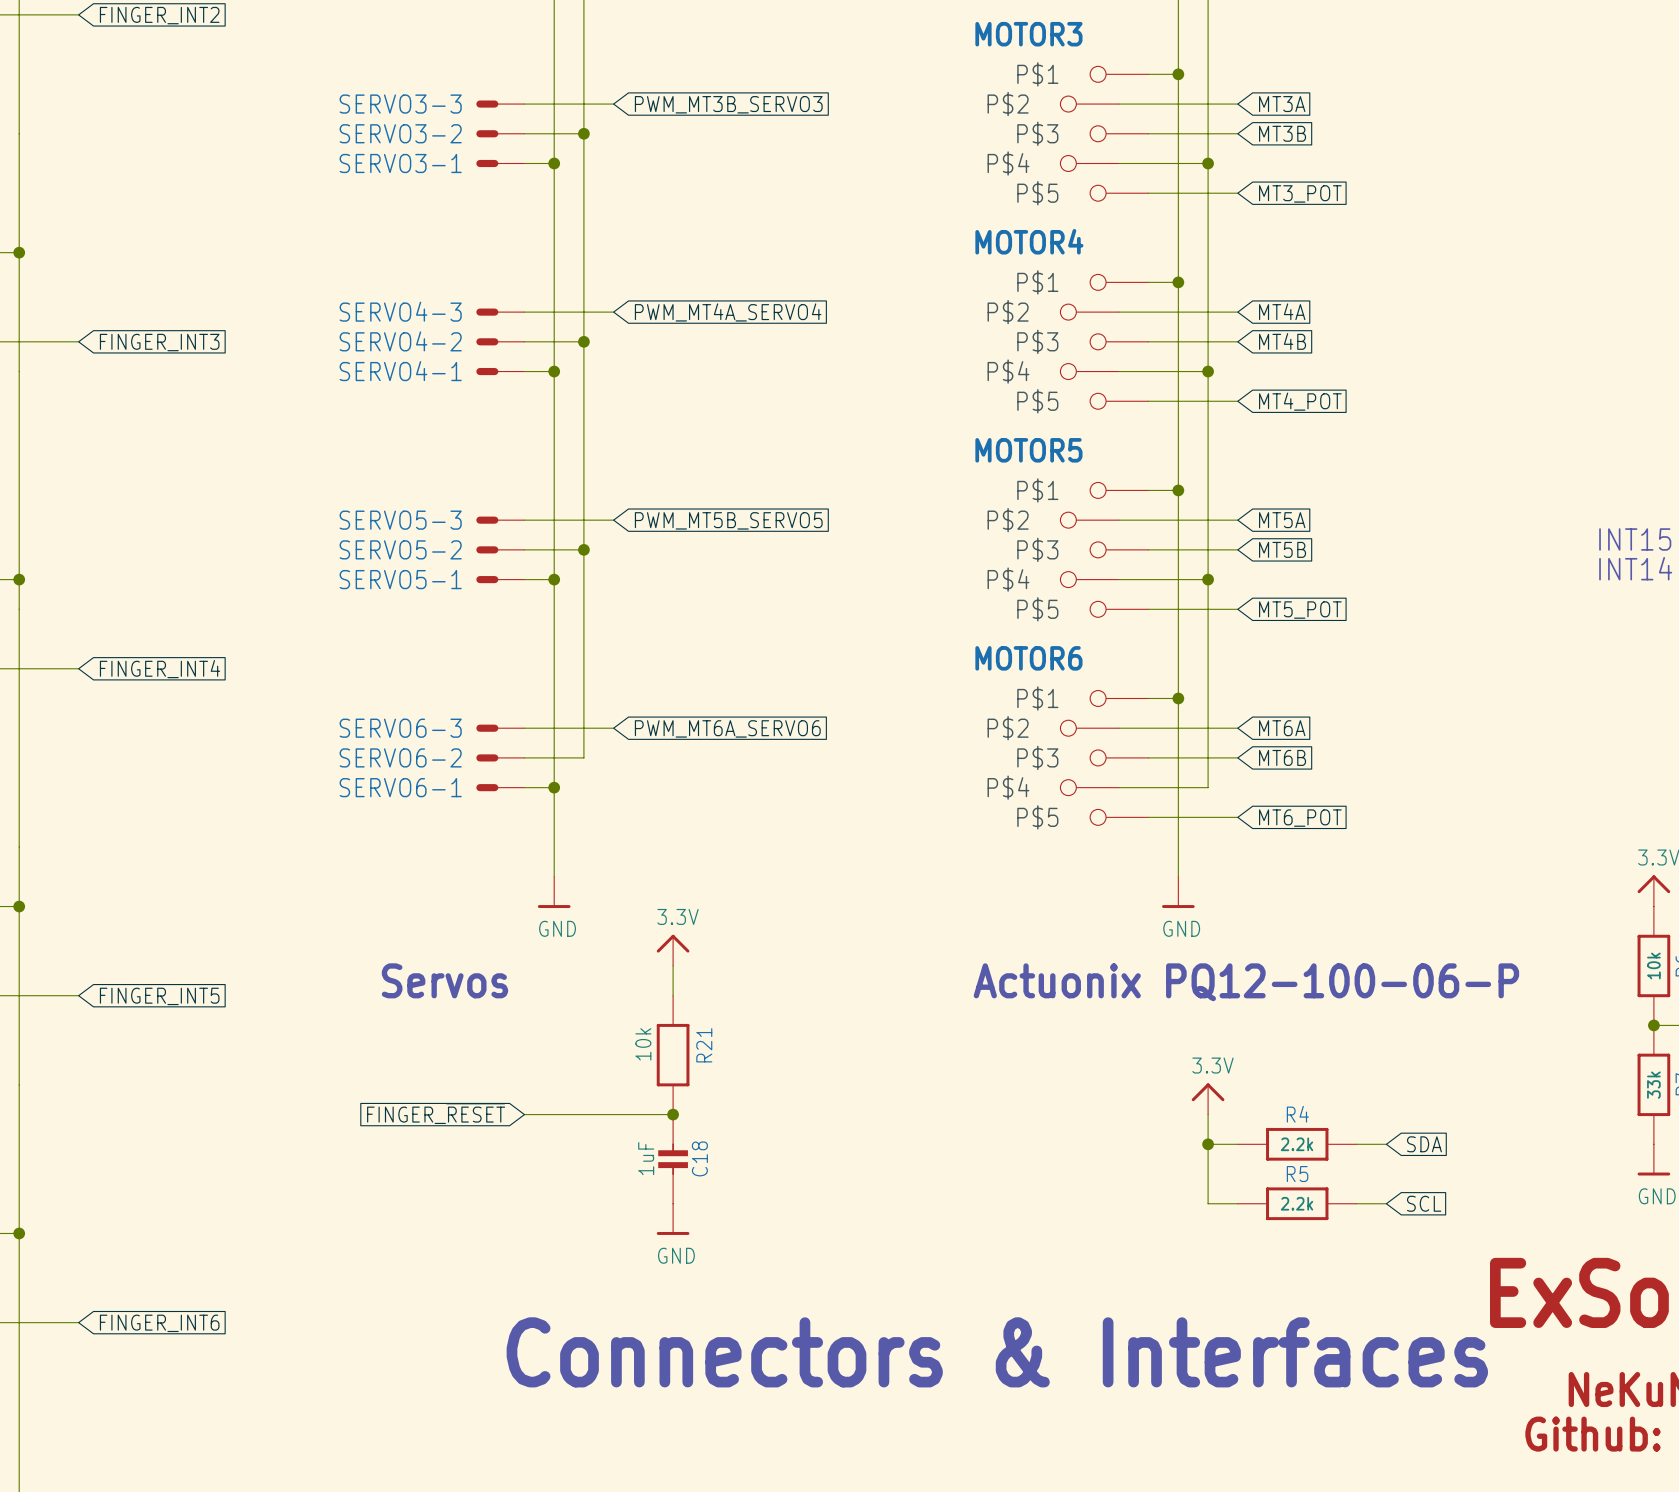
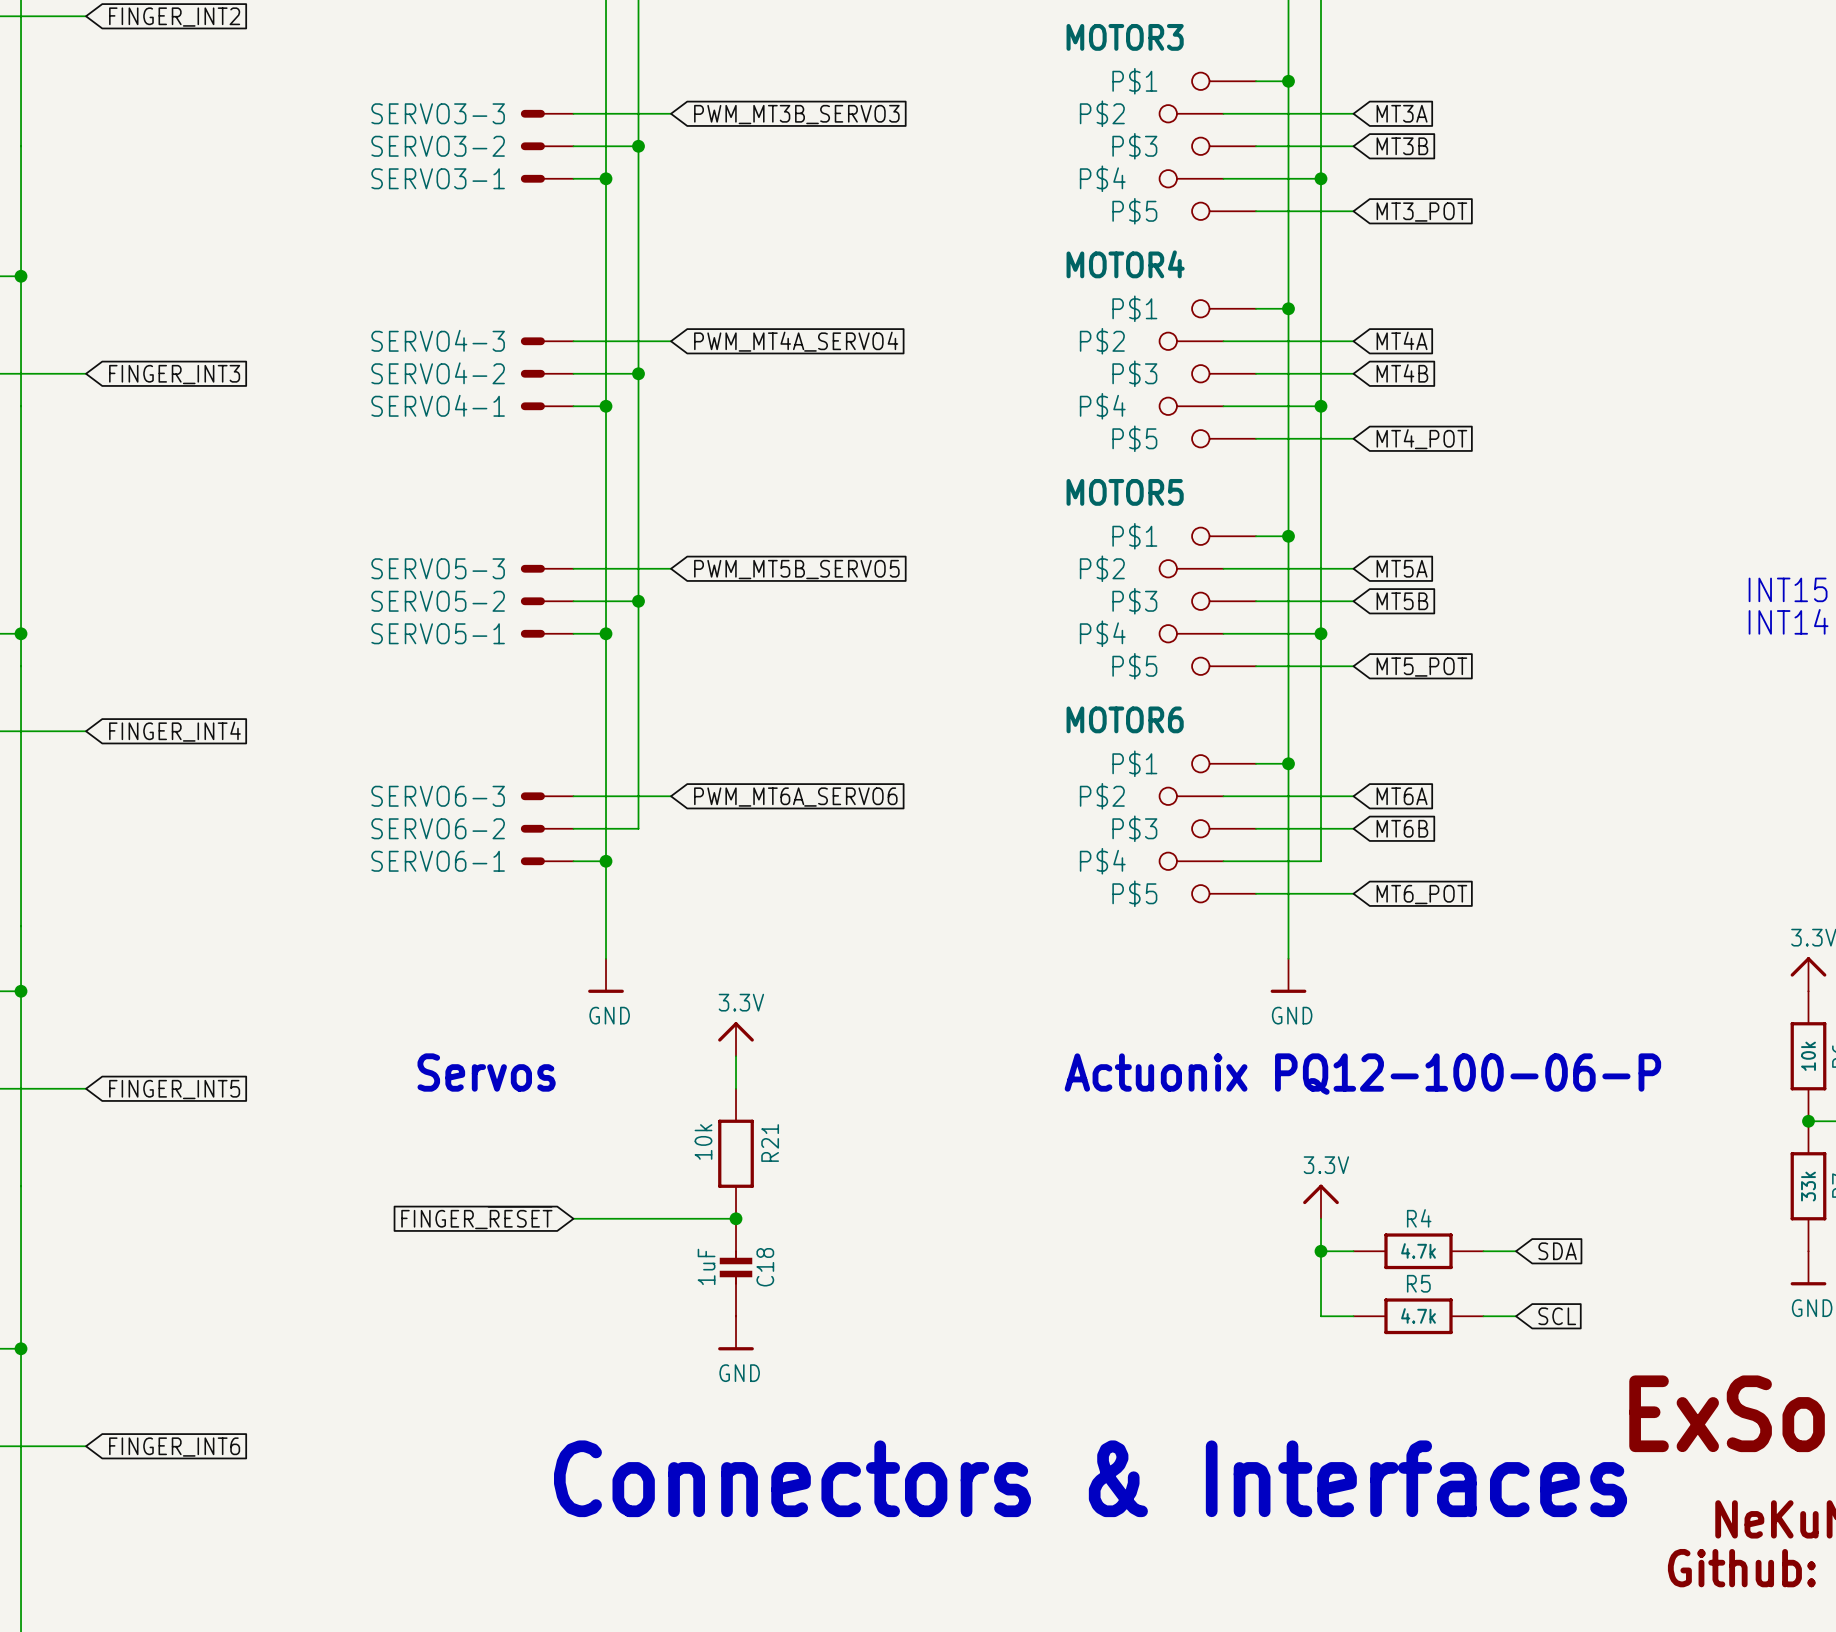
R4 value: 2.2k (1296, 1144) -> 4.7k (1418, 1250)
R5 value: 2.2k (1296, 1203) -> 4.7k (1418, 1315)

